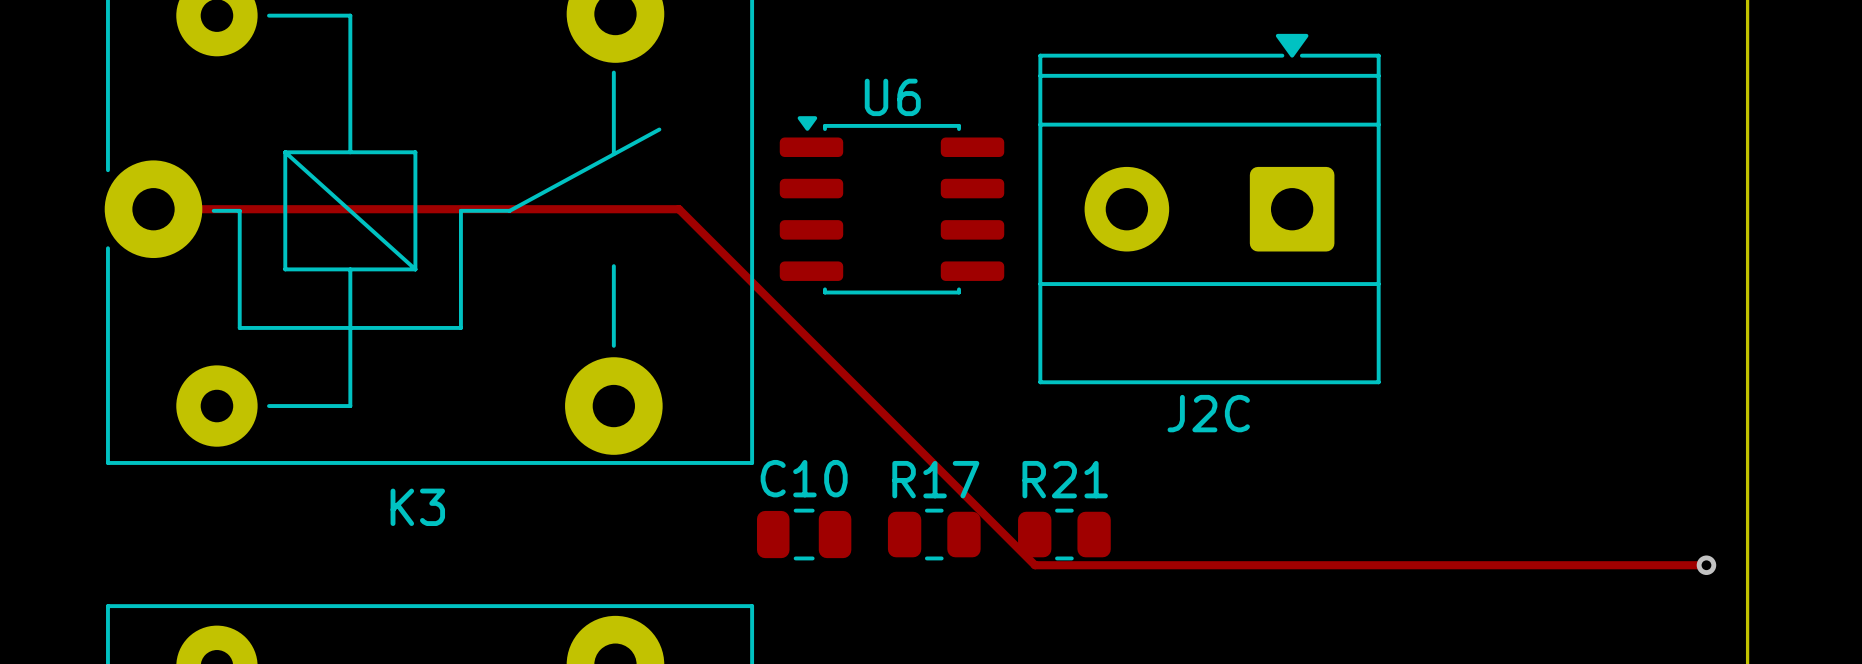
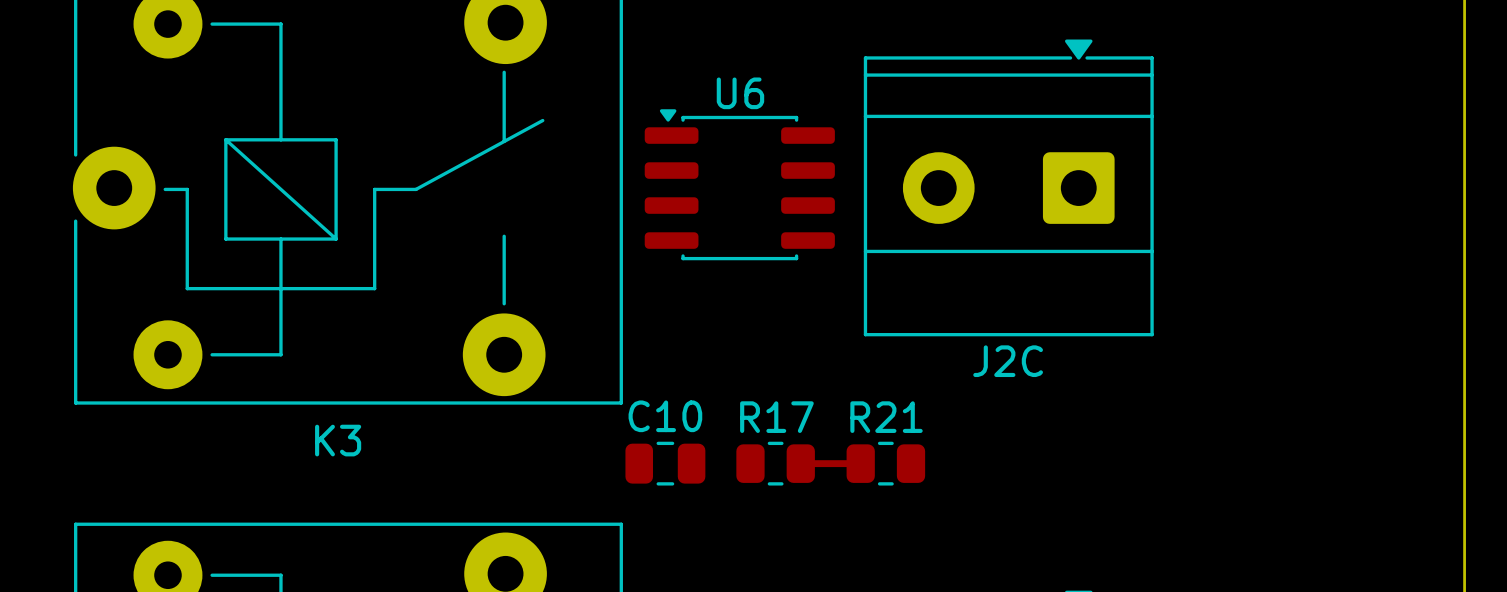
track: (153, 209) (679, 209) (1035, 565) (1706, 565) -> none
track: none -> (800, 463) (860, 463)
via: (1706, 565) -> none

